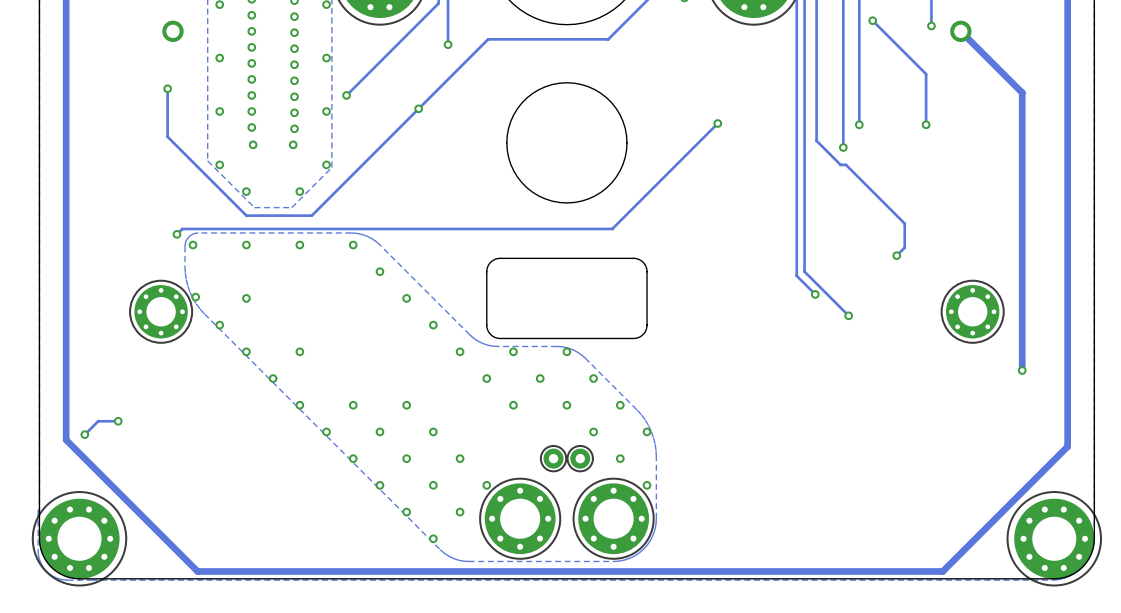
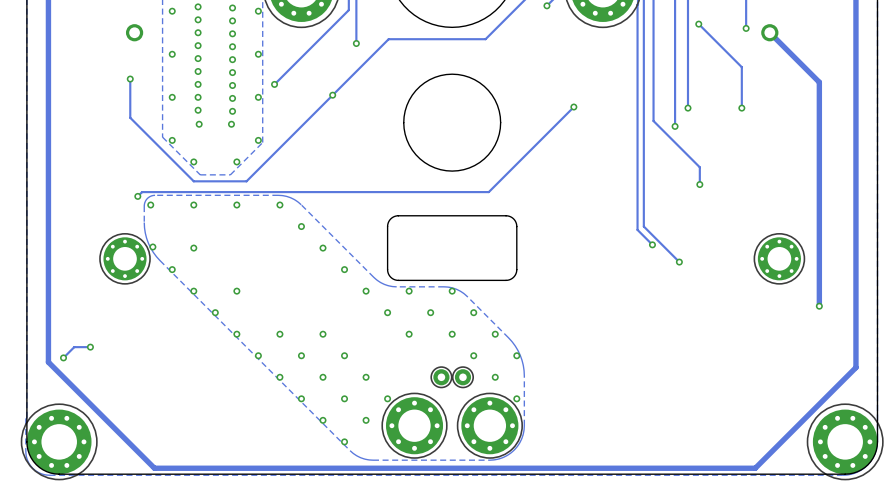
track: (840, 164) (845, 164) (904, 223) (904, 247) (896, 255) -> (672, 140) (699, 167) (699, 184)
via position: (896, 255) -> (699, 184)

